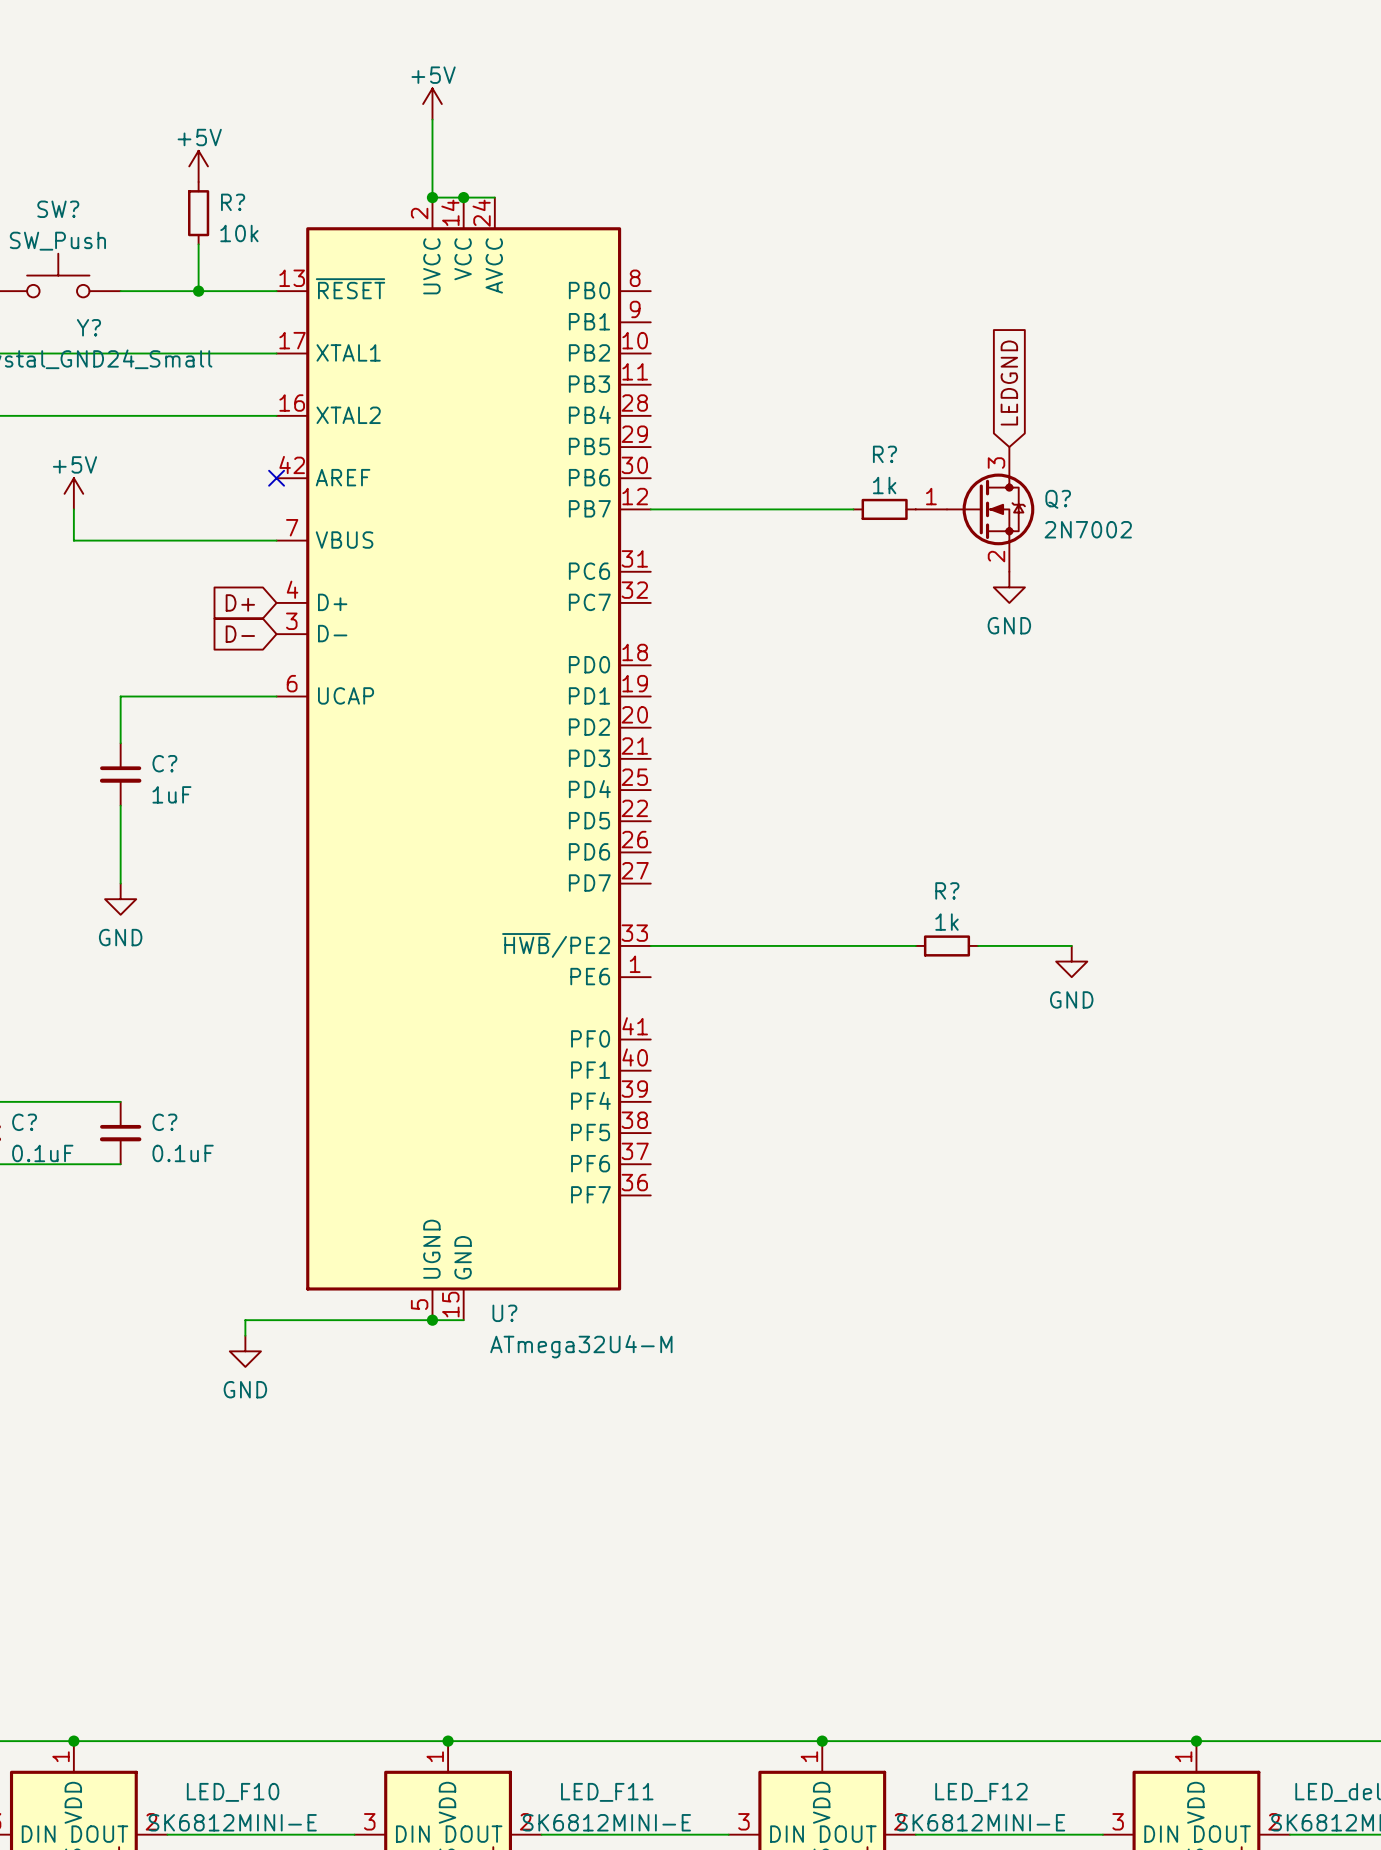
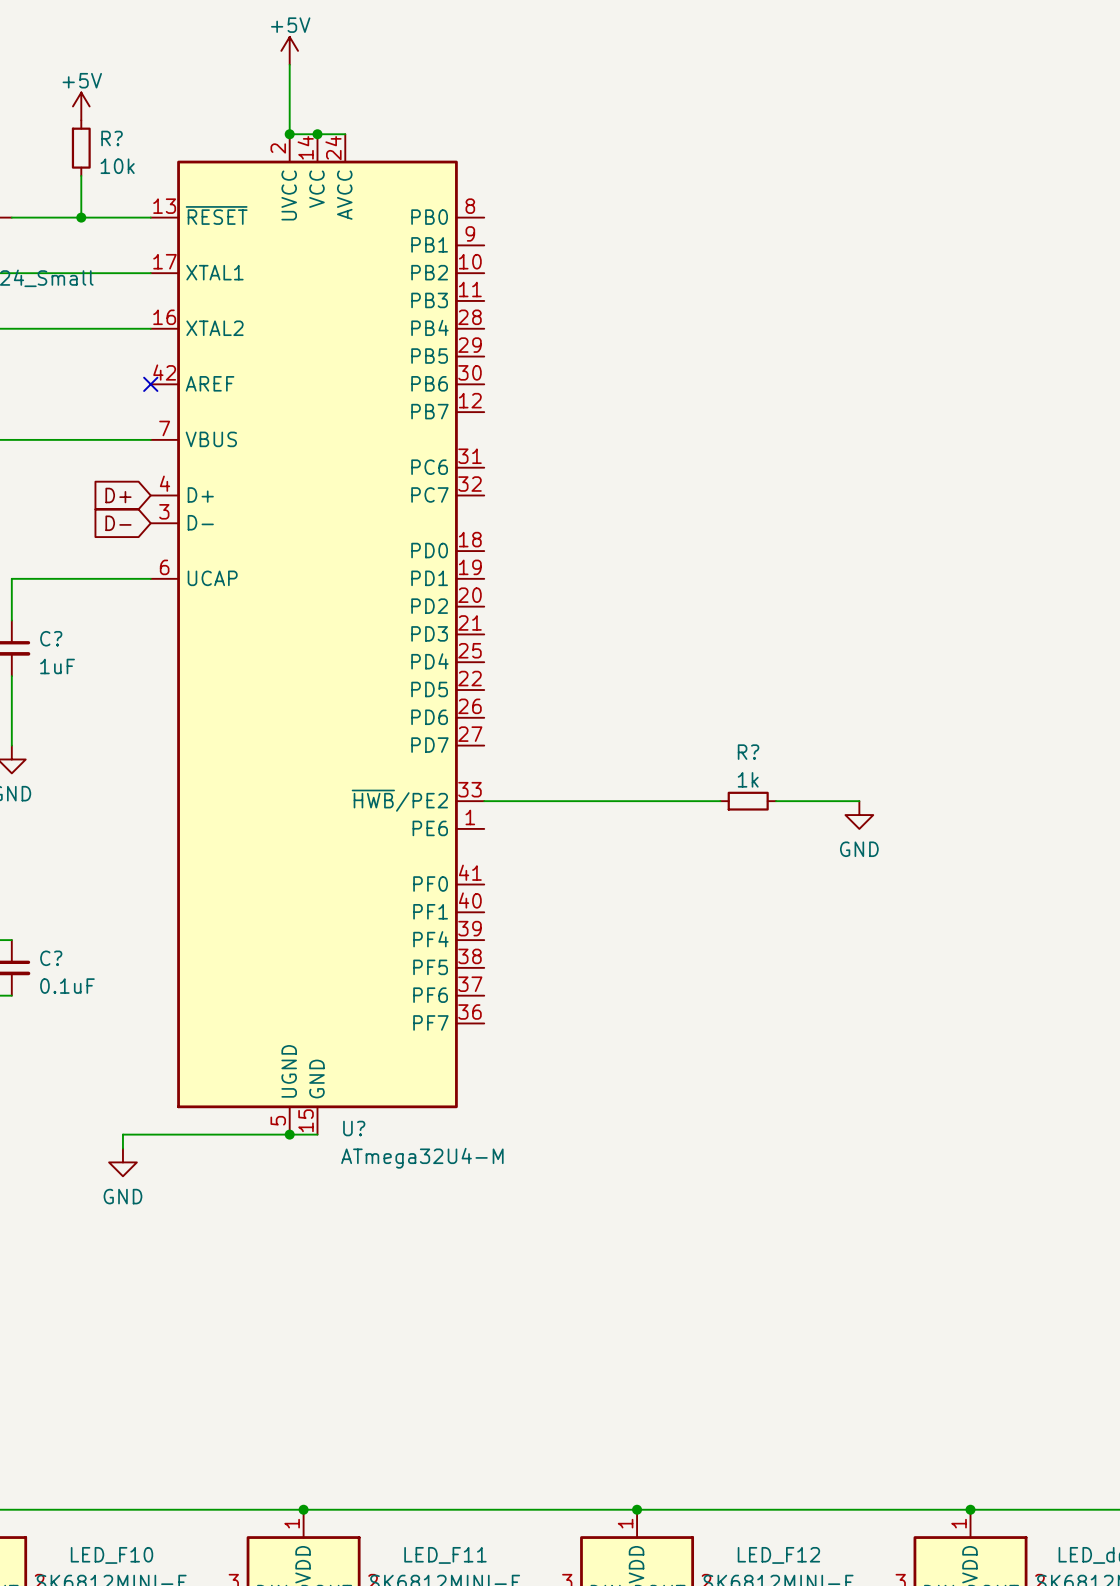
global label: LEDGND (1009, 382) -> none
wire: (650, 509) (853, 509) -> none
R?: 1k (884, 509) -> none
Q?: 2N7002 (975, 509) -> none
power symbol: GND (1009, 587) -> none

